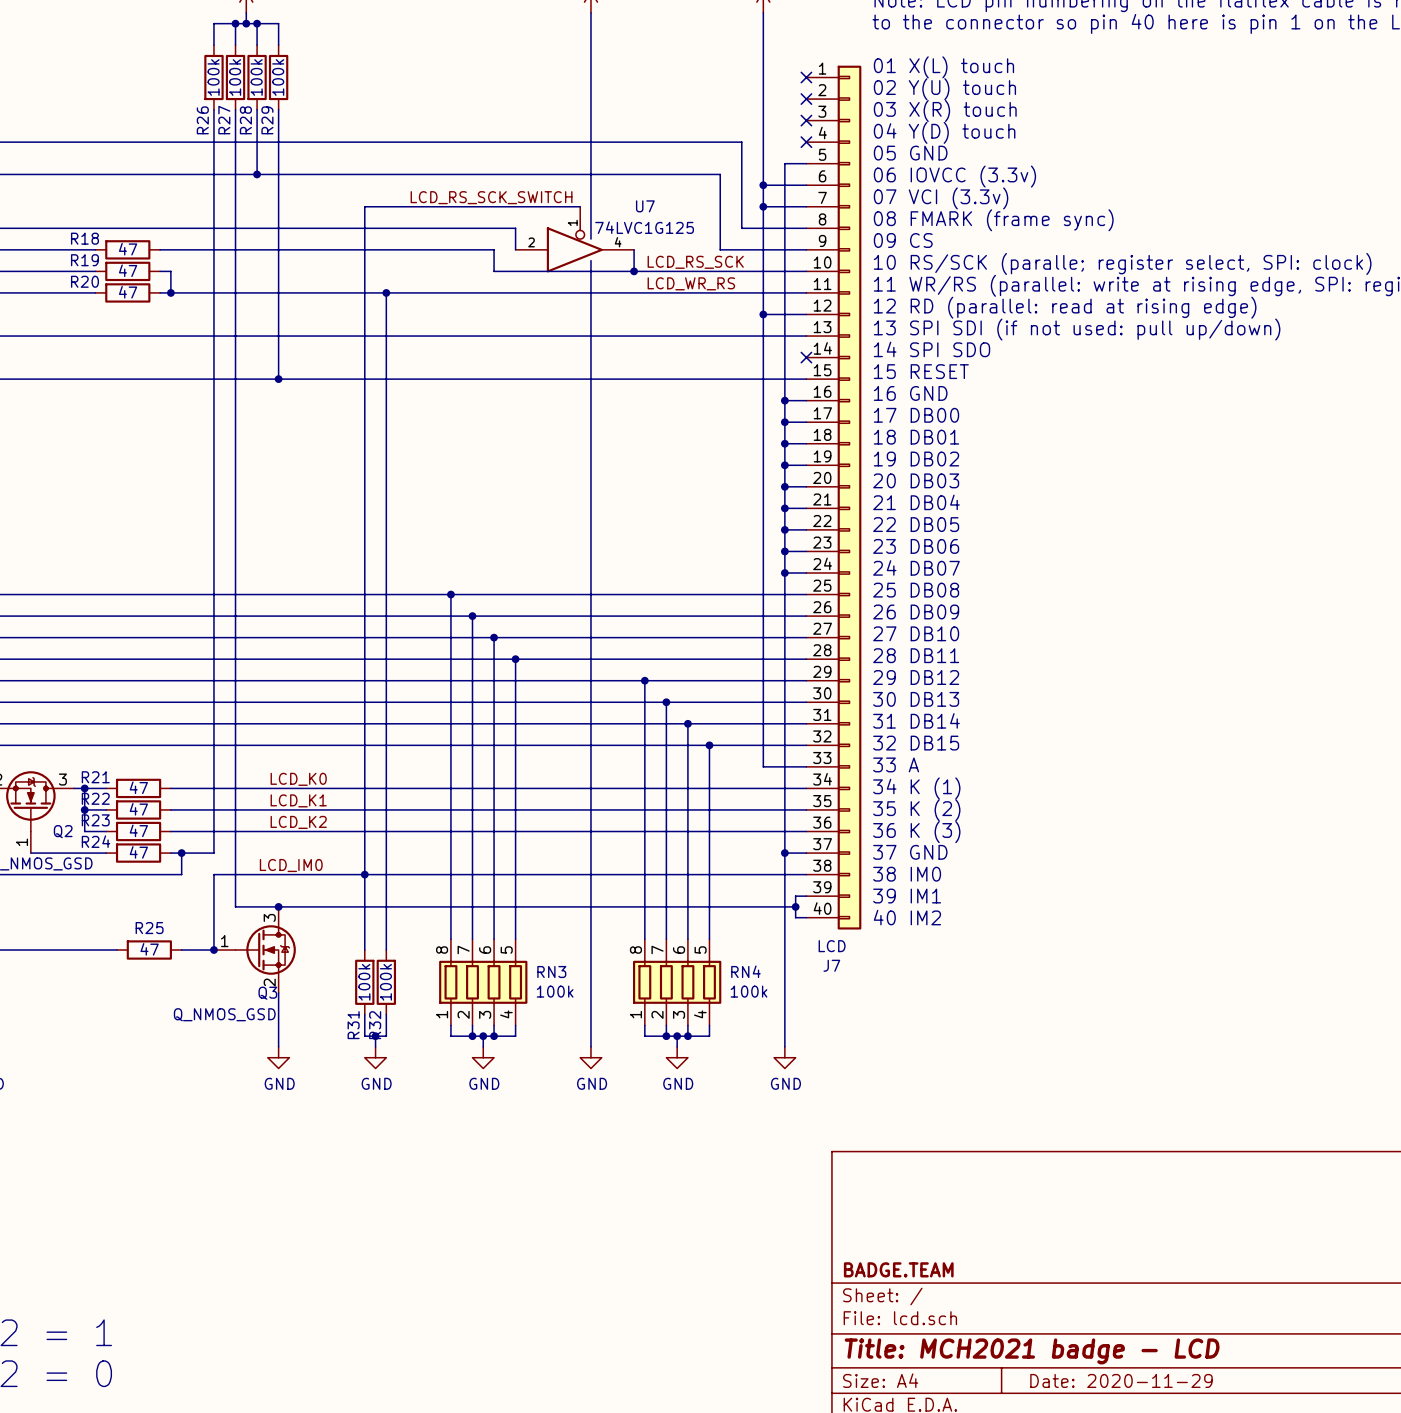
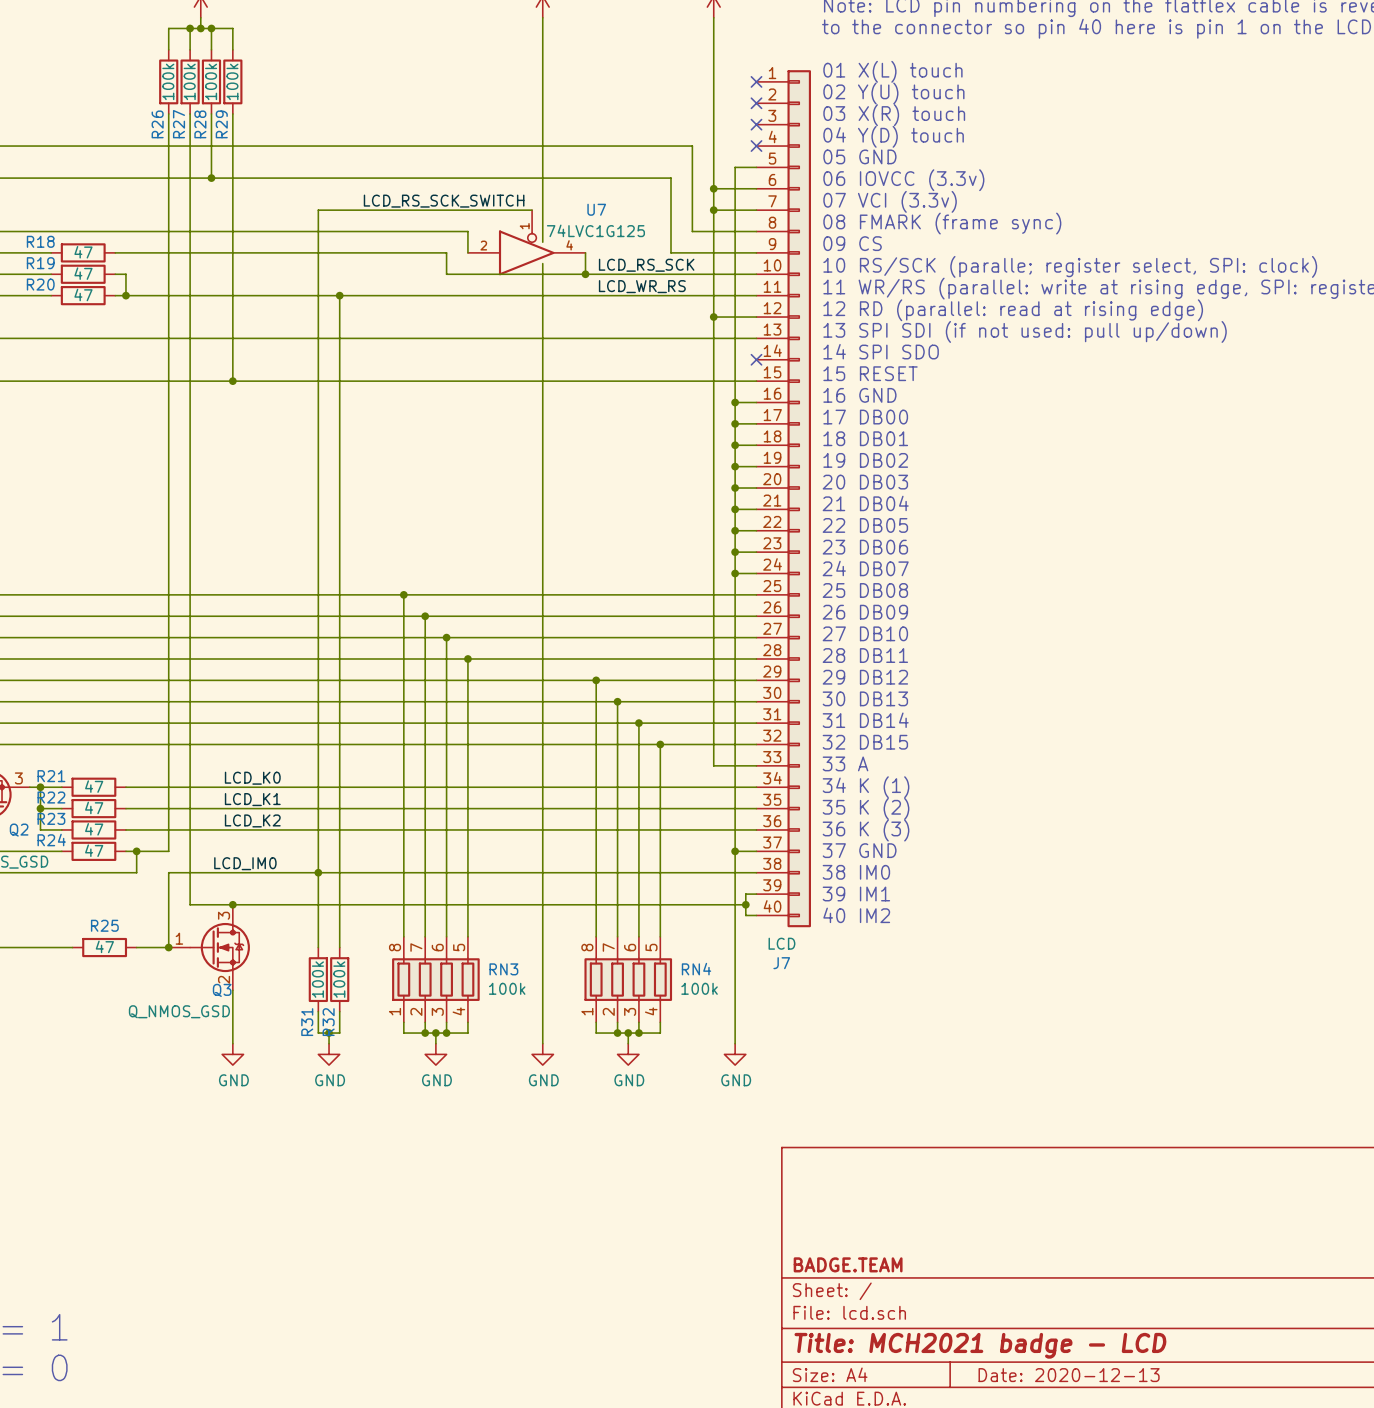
title block: Date: 2020-11-29 (1121, 1380) -> Date: 2020-12-13 (1069, 1375)

